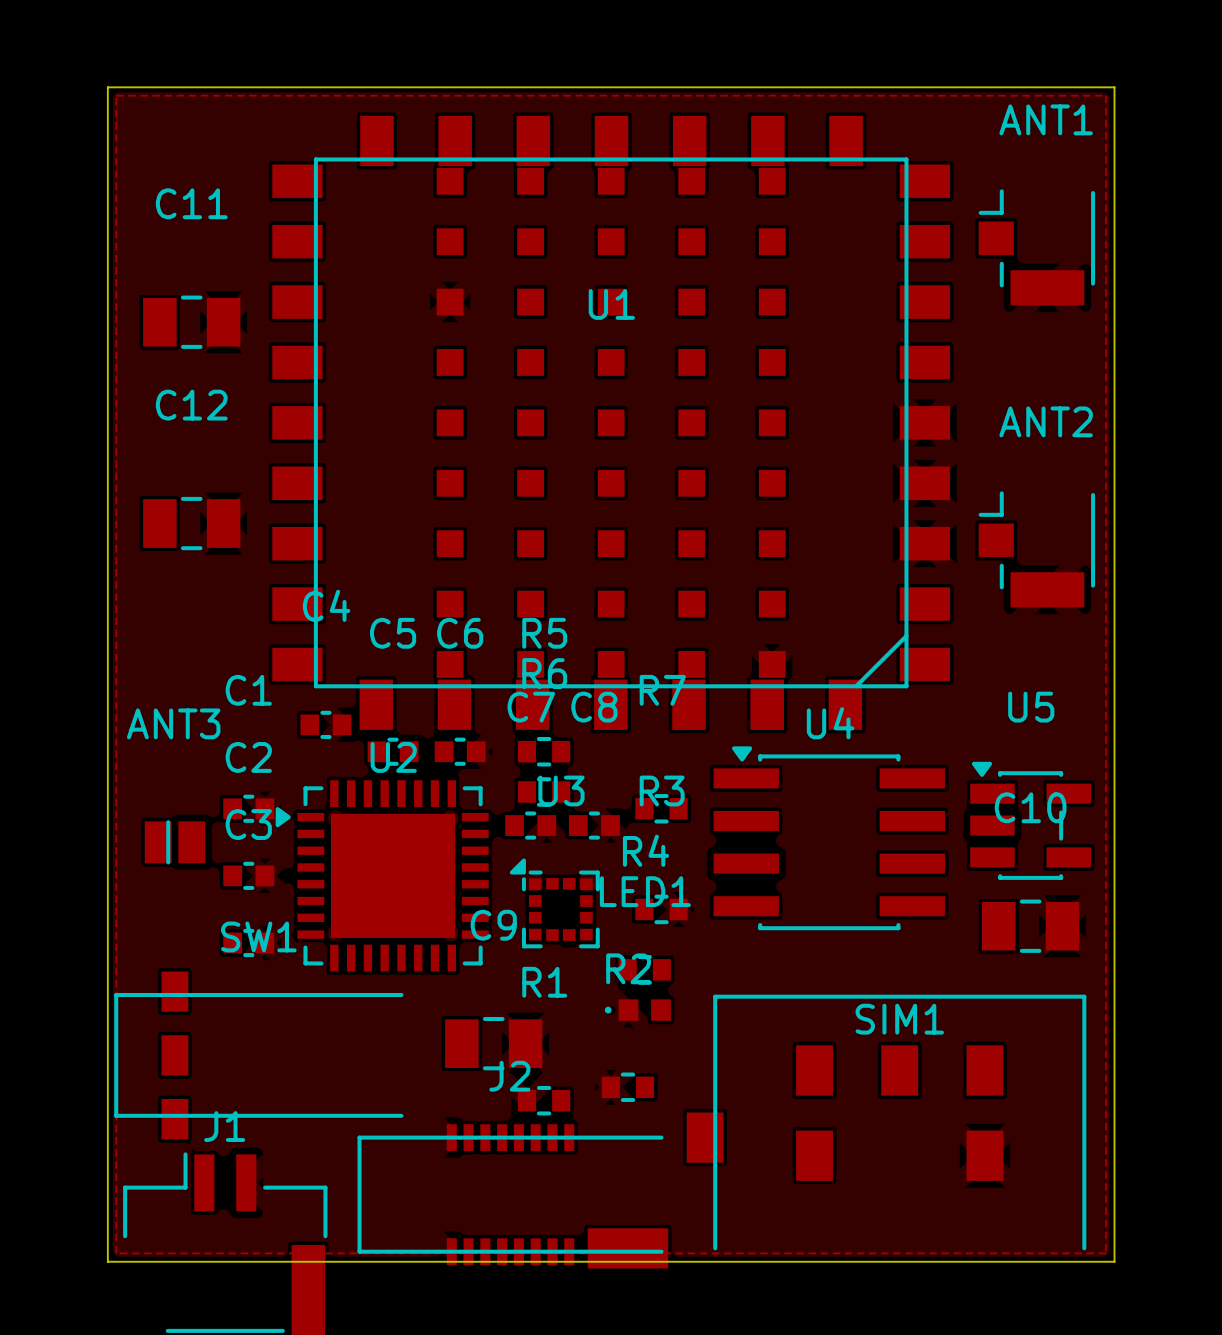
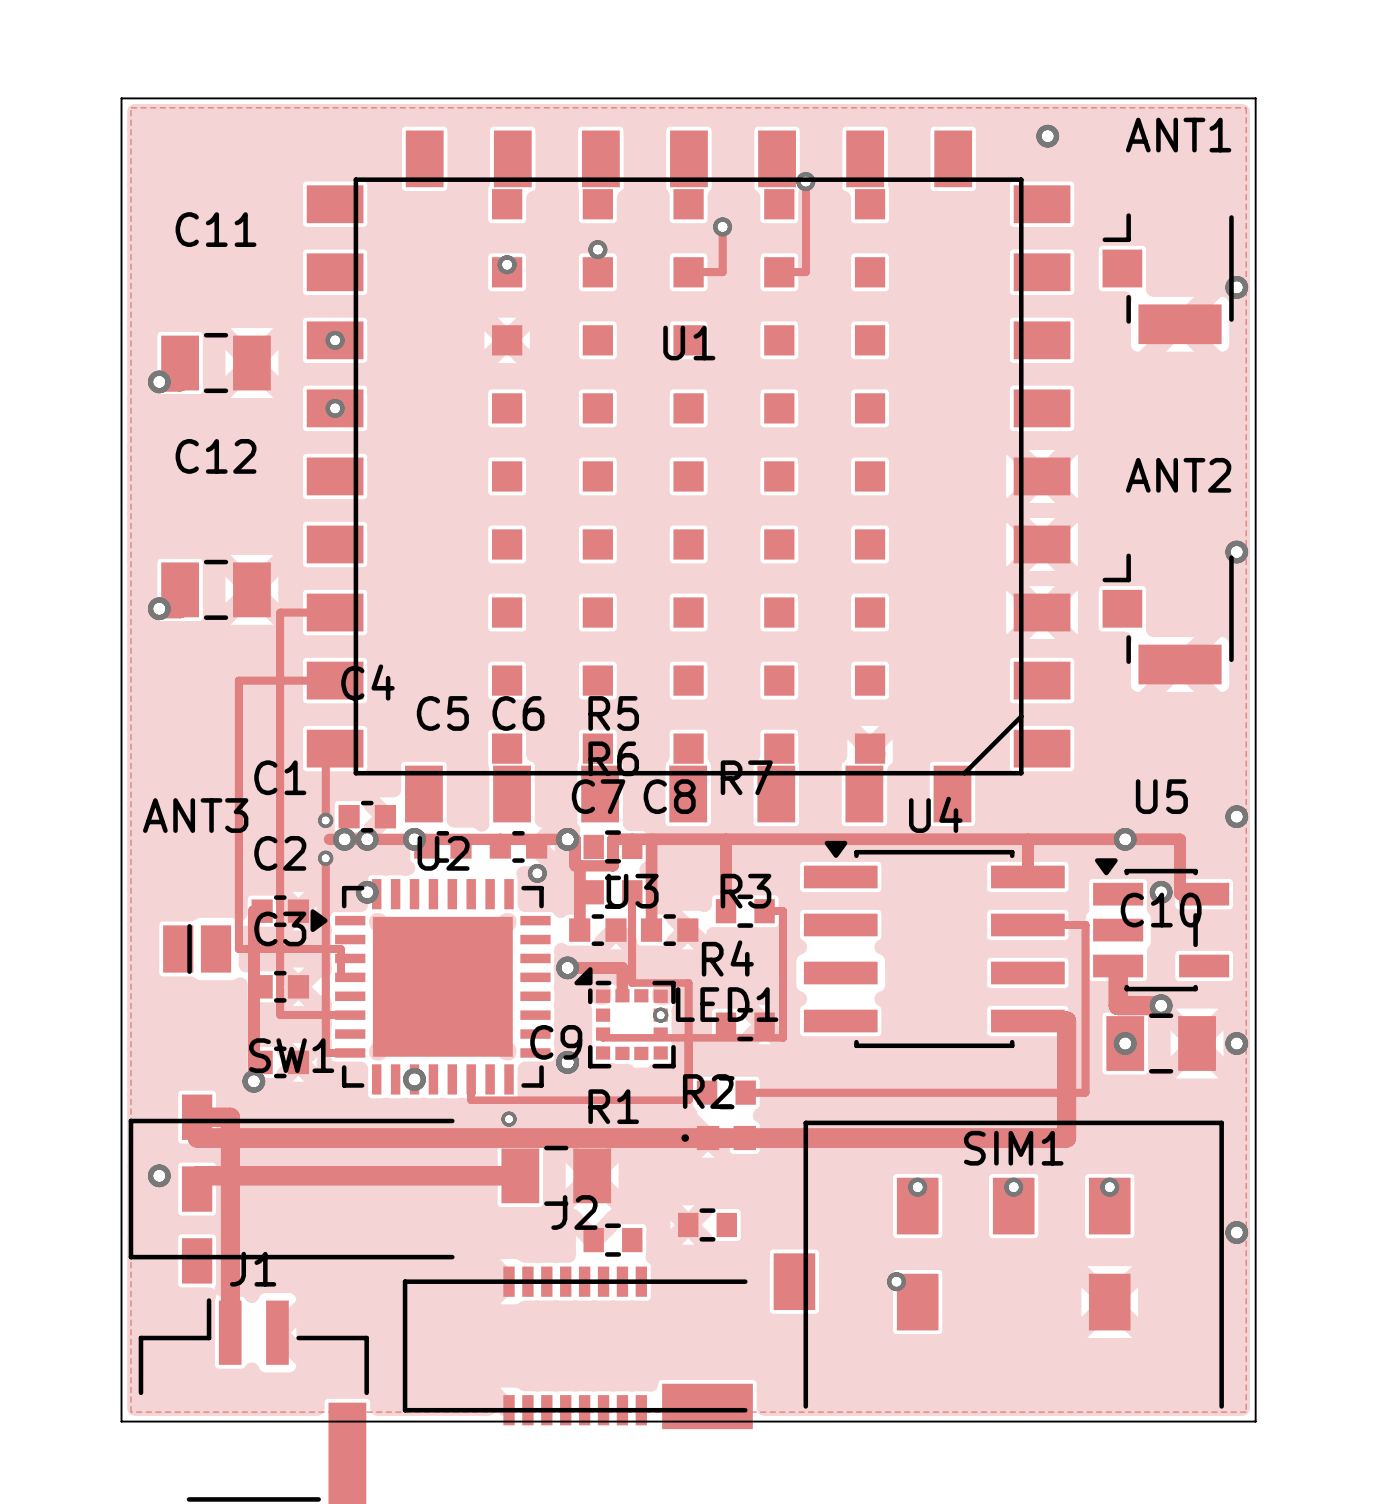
via: none -> (1047, 136)
track: none -> (805, 181) (805, 272) (779, 272)
via: none -> (805, 181)
track: none -> (722, 226) (722, 272) (688, 272)
via: none -> (722, 226)
via: none -> (597, 249)
via: none -> (507, 264)
via: none -> (1236, 287)
via: none -> (335, 340)
via: none -> (159, 381)
via: none -> (335, 408)
via: none -> (1236, 552)
via: none -> (159, 608)
track: none -> (335, 612) (280, 612) (280, 1015) (350, 1015)
track: none -> (335, 680) (238, 680) (238, 949) (340, 949) (340, 977) (350, 977)
track: none -> (335, 748) (325, 748) (325, 820)
via: none -> (1236, 816)
via: none -> (325, 820)
track: none -> (329, 839) (575, 839) (575, 865) (612, 865) (612, 839) (1180, 839) (1180, 894) (1204, 894)
via: none -> (344, 839)
via: none -> (367, 839)
via: none -> (414, 839)
via: none -> (567, 839)
track: none -> (651, 839) (651, 930)
track: none -> (726, 839) (726, 911)
track: none -> (1027, 839) (1027, 876)
via: none -> (1125, 839)
track: none -> (325, 858) (325, 1052) (350, 1052)
via: none -> (325, 858)
track: none -> (579, 865) (579, 930)
via: none -> (537, 873)
via: none -> (367, 892)
track: none -> (632, 892) (632, 983) (688, 983) (688, 1100) (471, 1100) (471, 1079)
via: none -> (1161, 892)
track: none -> (262, 911) (253, 911) (253, 1081)
track: none -> (764, 911) (783, 911) (783, 1037) (603, 1037) (603, 1034)
track: none -> (1027, 924) (1085, 924) (1085, 1092) (745, 1092)
track: none -> (1118, 966) (1118, 1005) (1161, 1005)
track: none -> (567, 967) (622, 967) (622, 995)
via: none -> (567, 967)
via: none -> (1161, 1005)
via: none -> (660, 1015)
track: none -> (1027, 1021) (1066, 1021) (1066, 1138) (197, 1138) (197, 1117) (230, 1117) (230, 1332)
via: none -> (1125, 1043)
via: none -> (1236, 1043)
via: none -> (567, 1062)
via: none -> (414, 1079)
via: none -> (253, 1081)
via: none -> (509, 1119)
via: none -> (159, 1175)
track: none -> (520, 1175) (197, 1175) (197, 1189)
via: none -> (917, 1187)
via: none -> (1013, 1187)
via: none -> (1109, 1187)
via: none -> (1236, 1232)
via: none -> (896, 1281)

